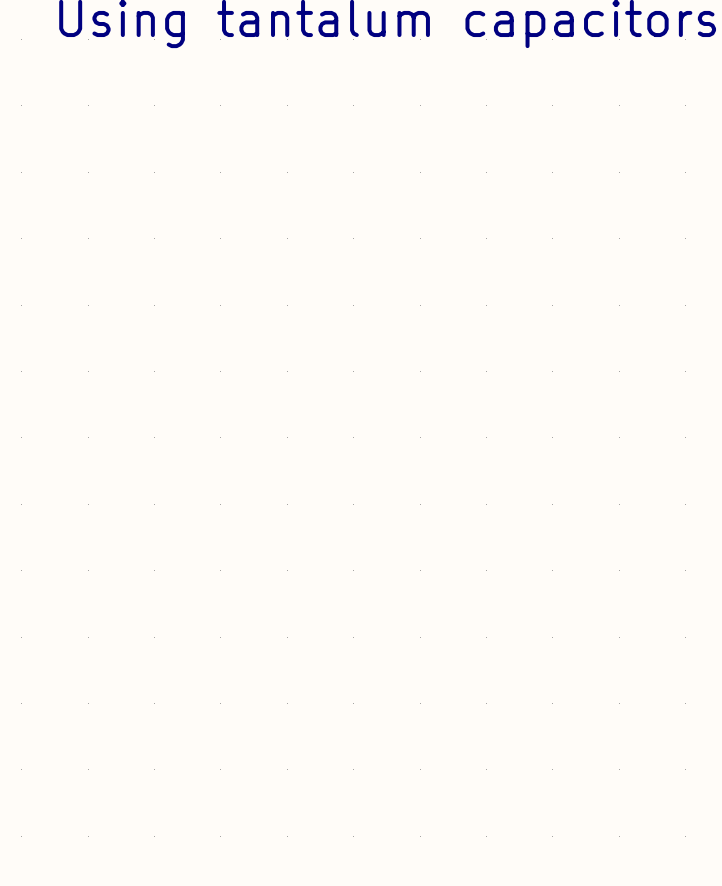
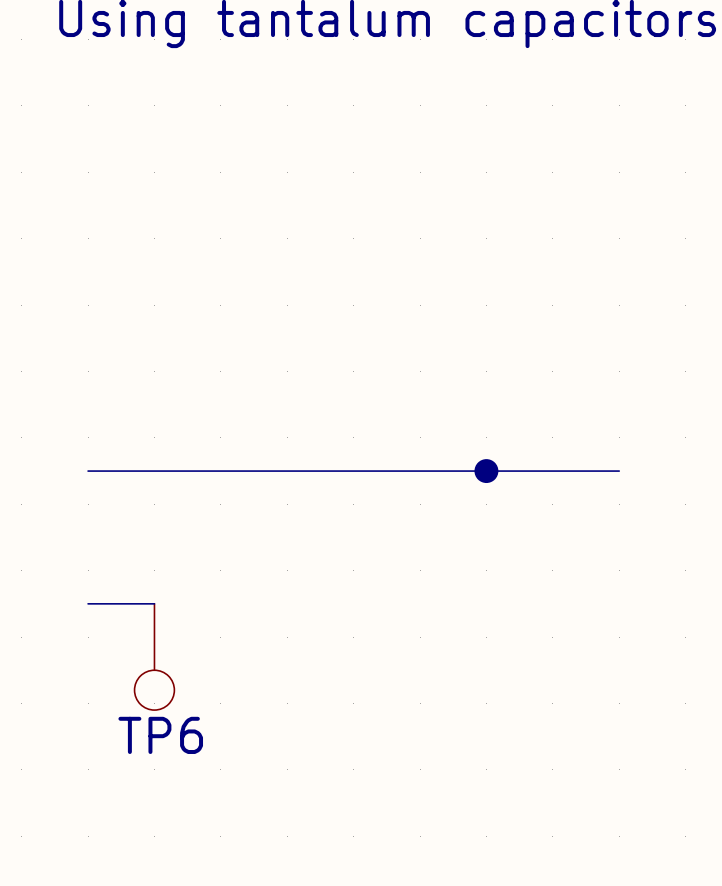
wire: none -> (88, 471) (619, 471)
junction: none -> (486, 471)
wire: none -> (88, 603) (154, 603)
TP6: none -> (154, 656)

